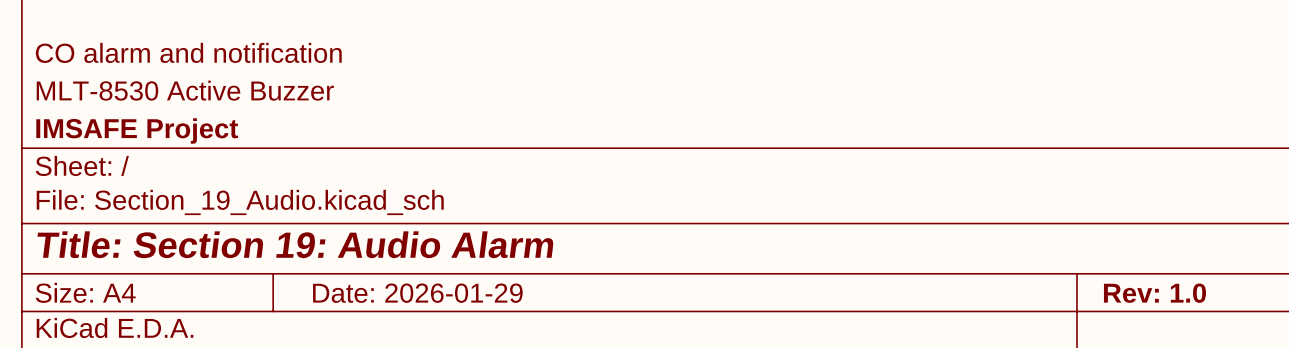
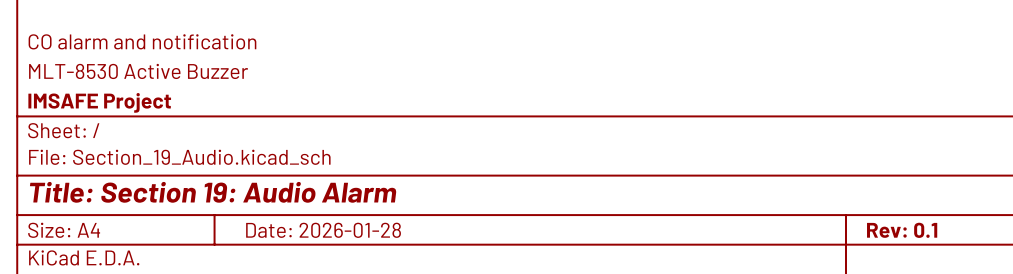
title block: Date: 2026-01-29 (417, 293) -> Date: 2026-01-28 (323, 230)
title block: Rev: 1.0 (1154, 293) -> Rev: 0.1 (902, 230)

